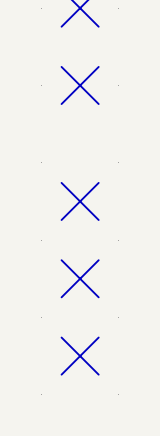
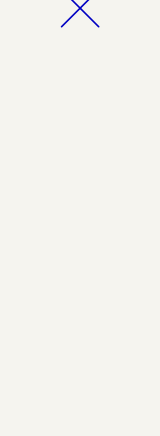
no-connect mark: (80, 85) -> none
no-connect mark: (80, 201) -> none
no-connect mark: (80, 278) -> none
no-connect mark: (80, 356) -> none

